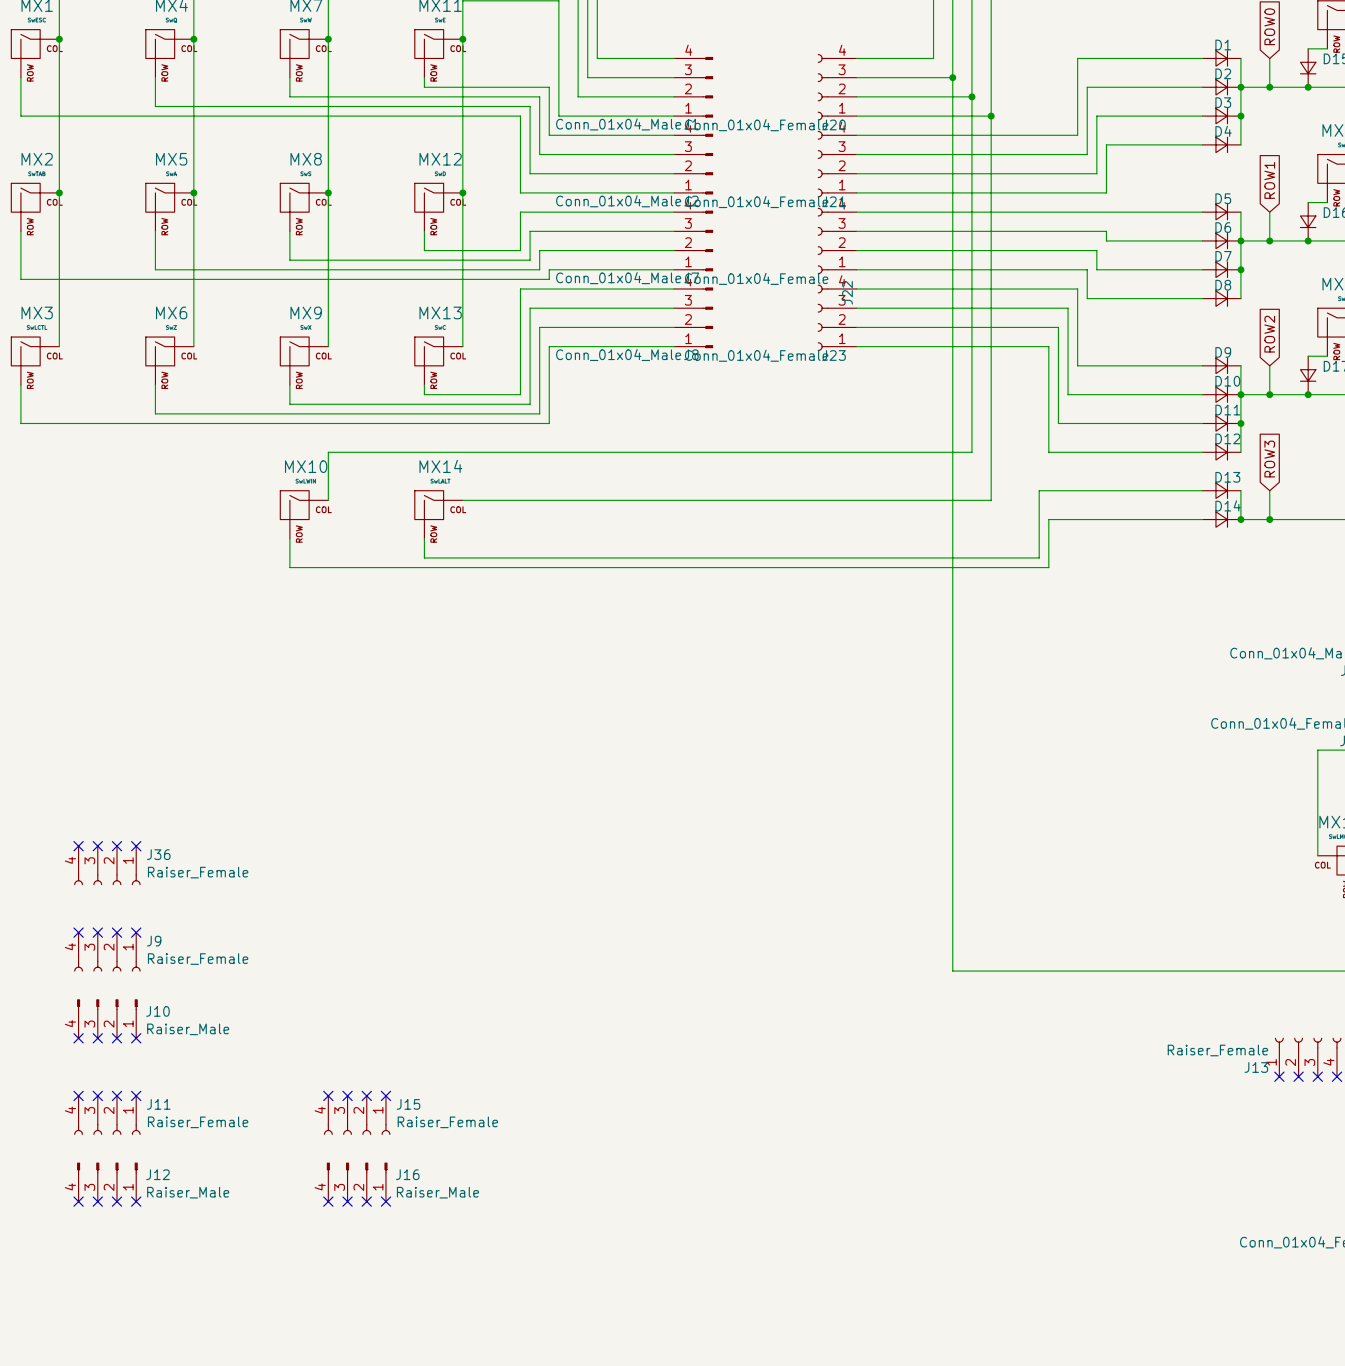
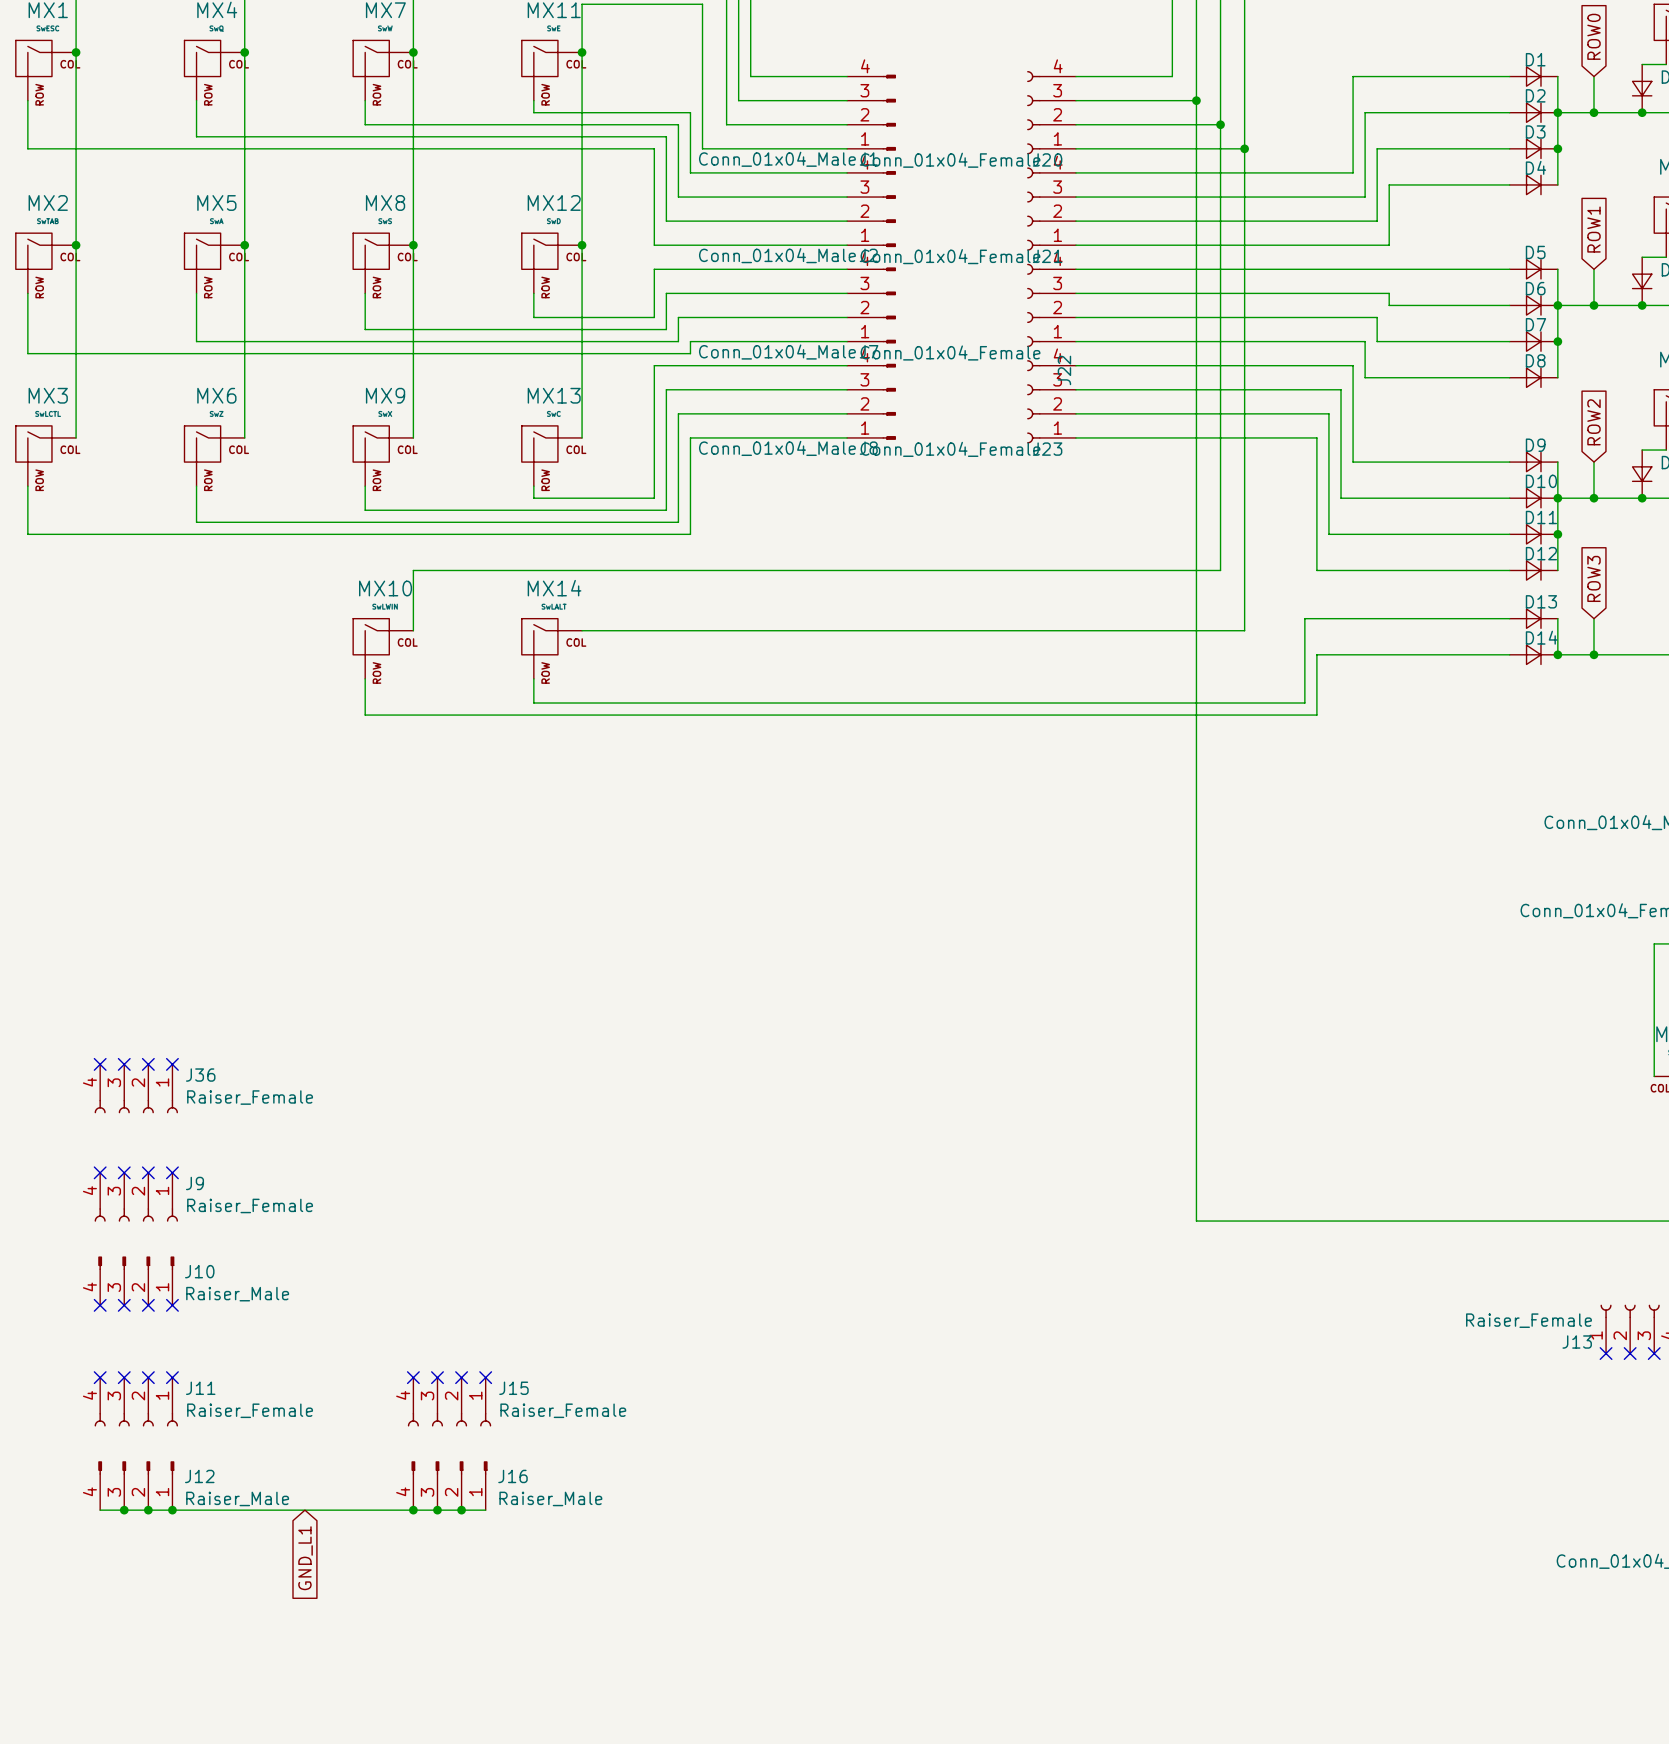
wire: none -> (100, 1510) (485, 1510)
no-connect mark: (78, 1201) -> none
no-connect mark: (97, 1201) -> none
junction: none -> (124, 1510)
no-connect mark: (117, 1201) -> none
junction: none -> (148, 1510)
no-connect mark: (136, 1201) -> none
junction: none -> (172, 1510)
no-connect mark: (328, 1201) -> none
junction: none -> (413, 1510)
no-connect mark: (347, 1201) -> none
junction: none -> (437, 1510)
no-connect mark: (366, 1201) -> none
junction: none -> (461, 1510)
no-connect mark: (385, 1201) -> none
global label: none -> GND_L1 (305, 1558)

